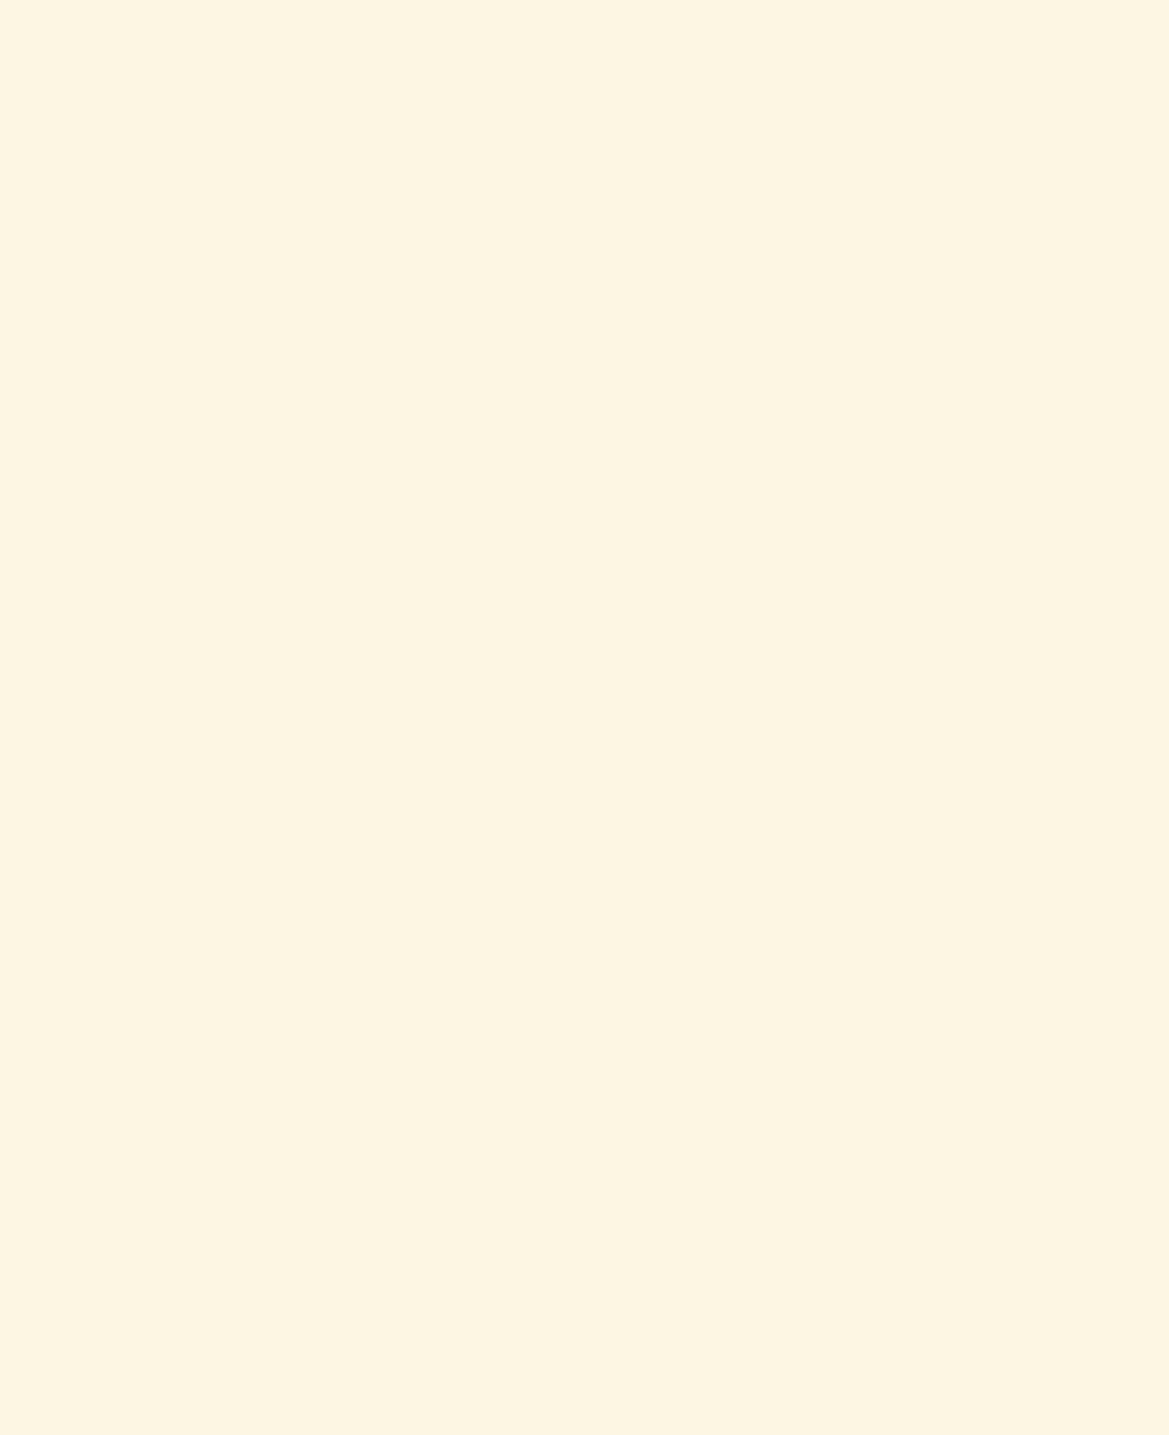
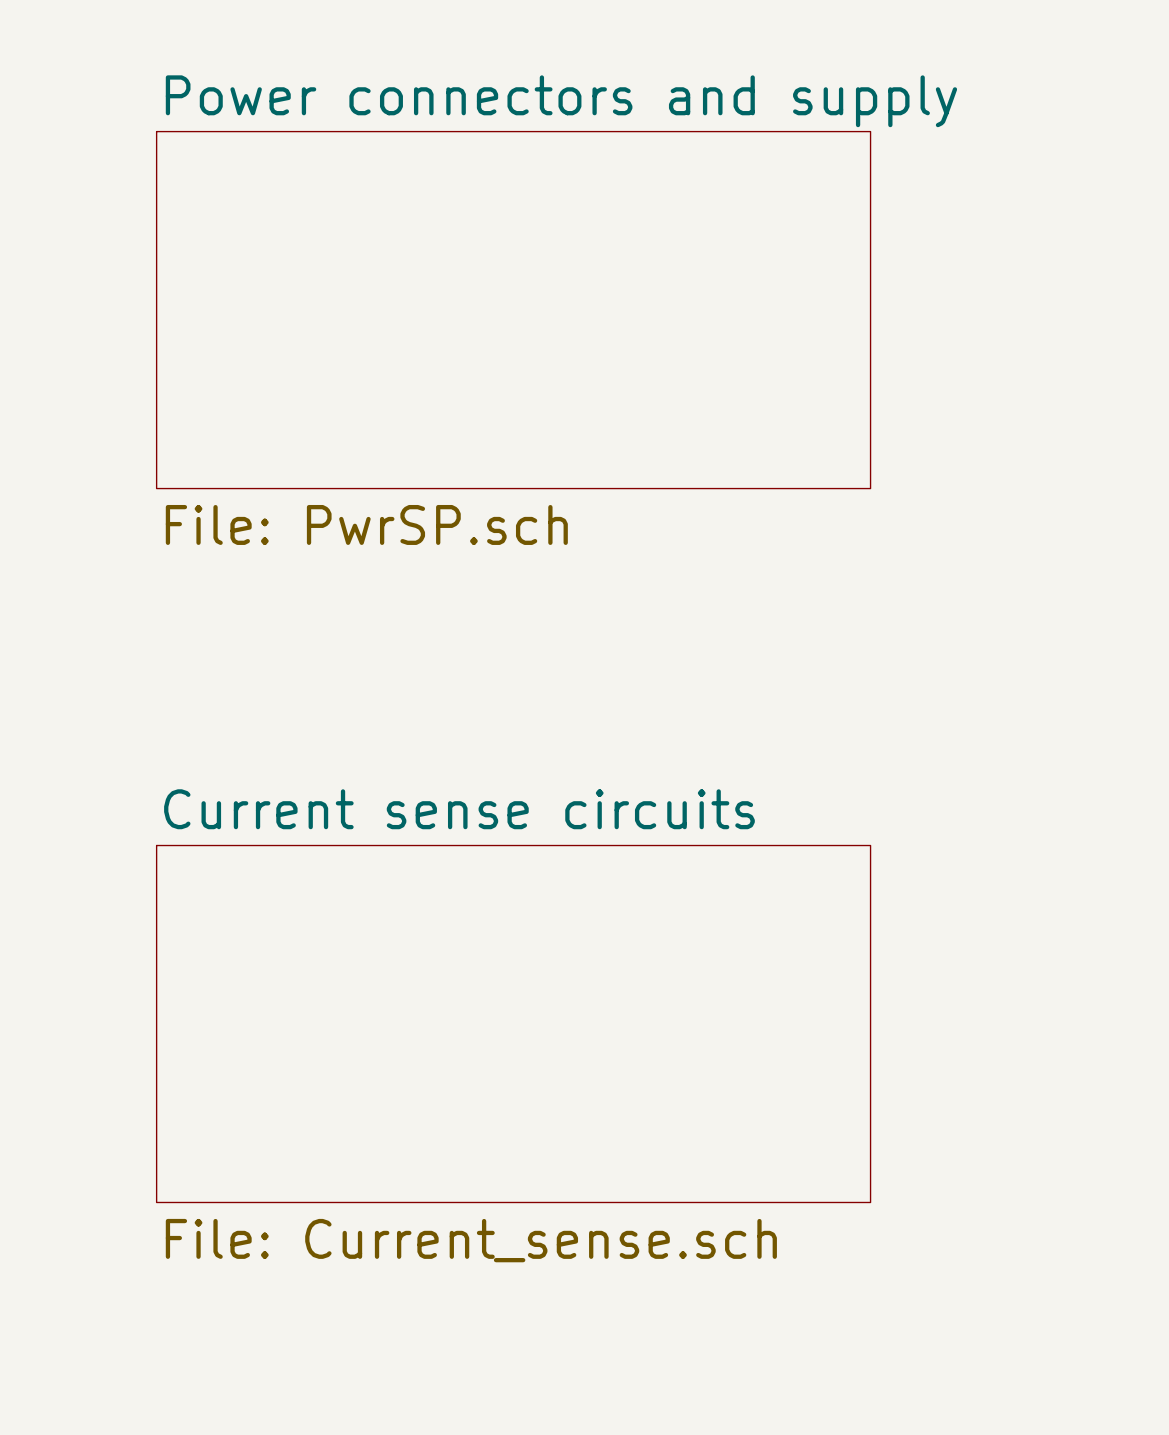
sheet Power connectors and supply: none -> File: PwrSP.sch (513, 310)
sheet Current sense circuits: none -> File: Current_sense.sch (513, 1024)

